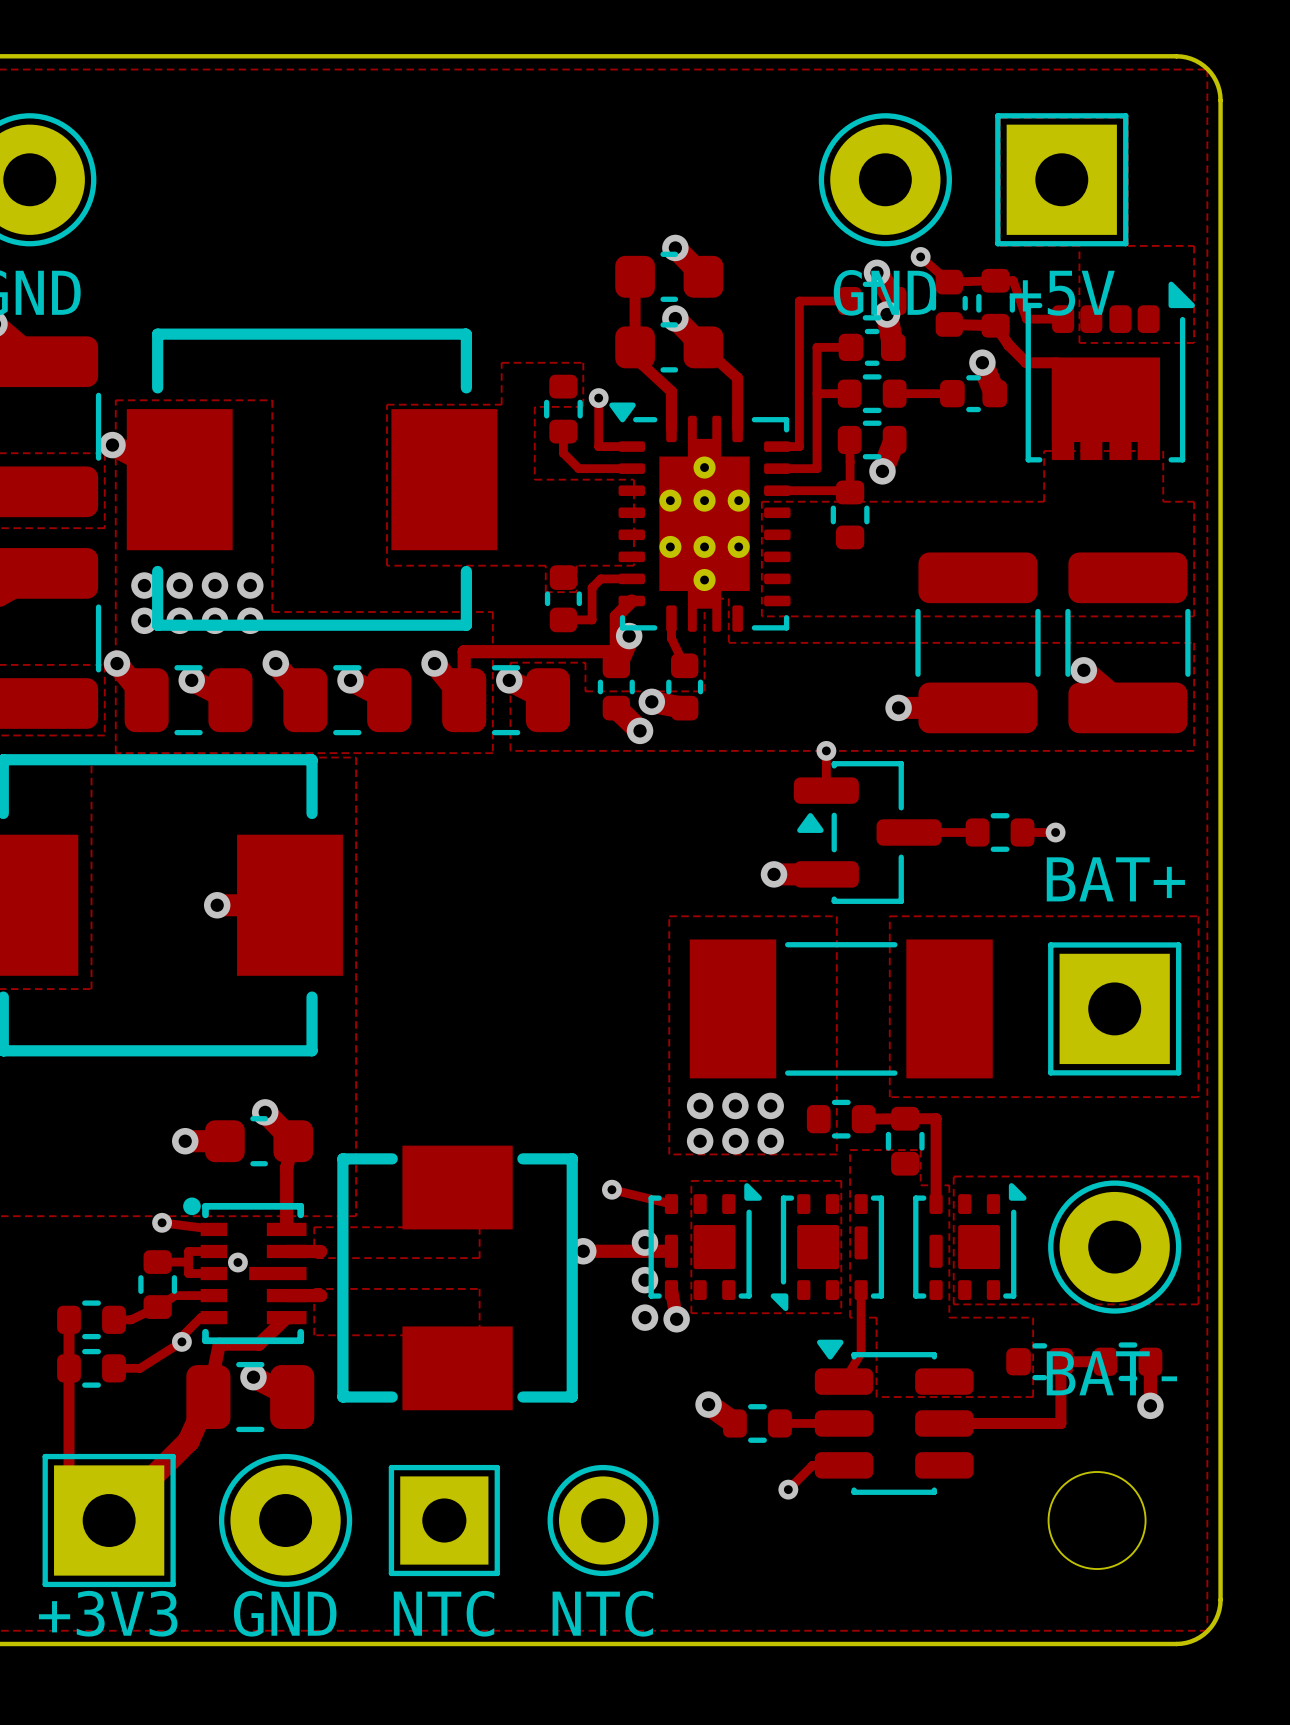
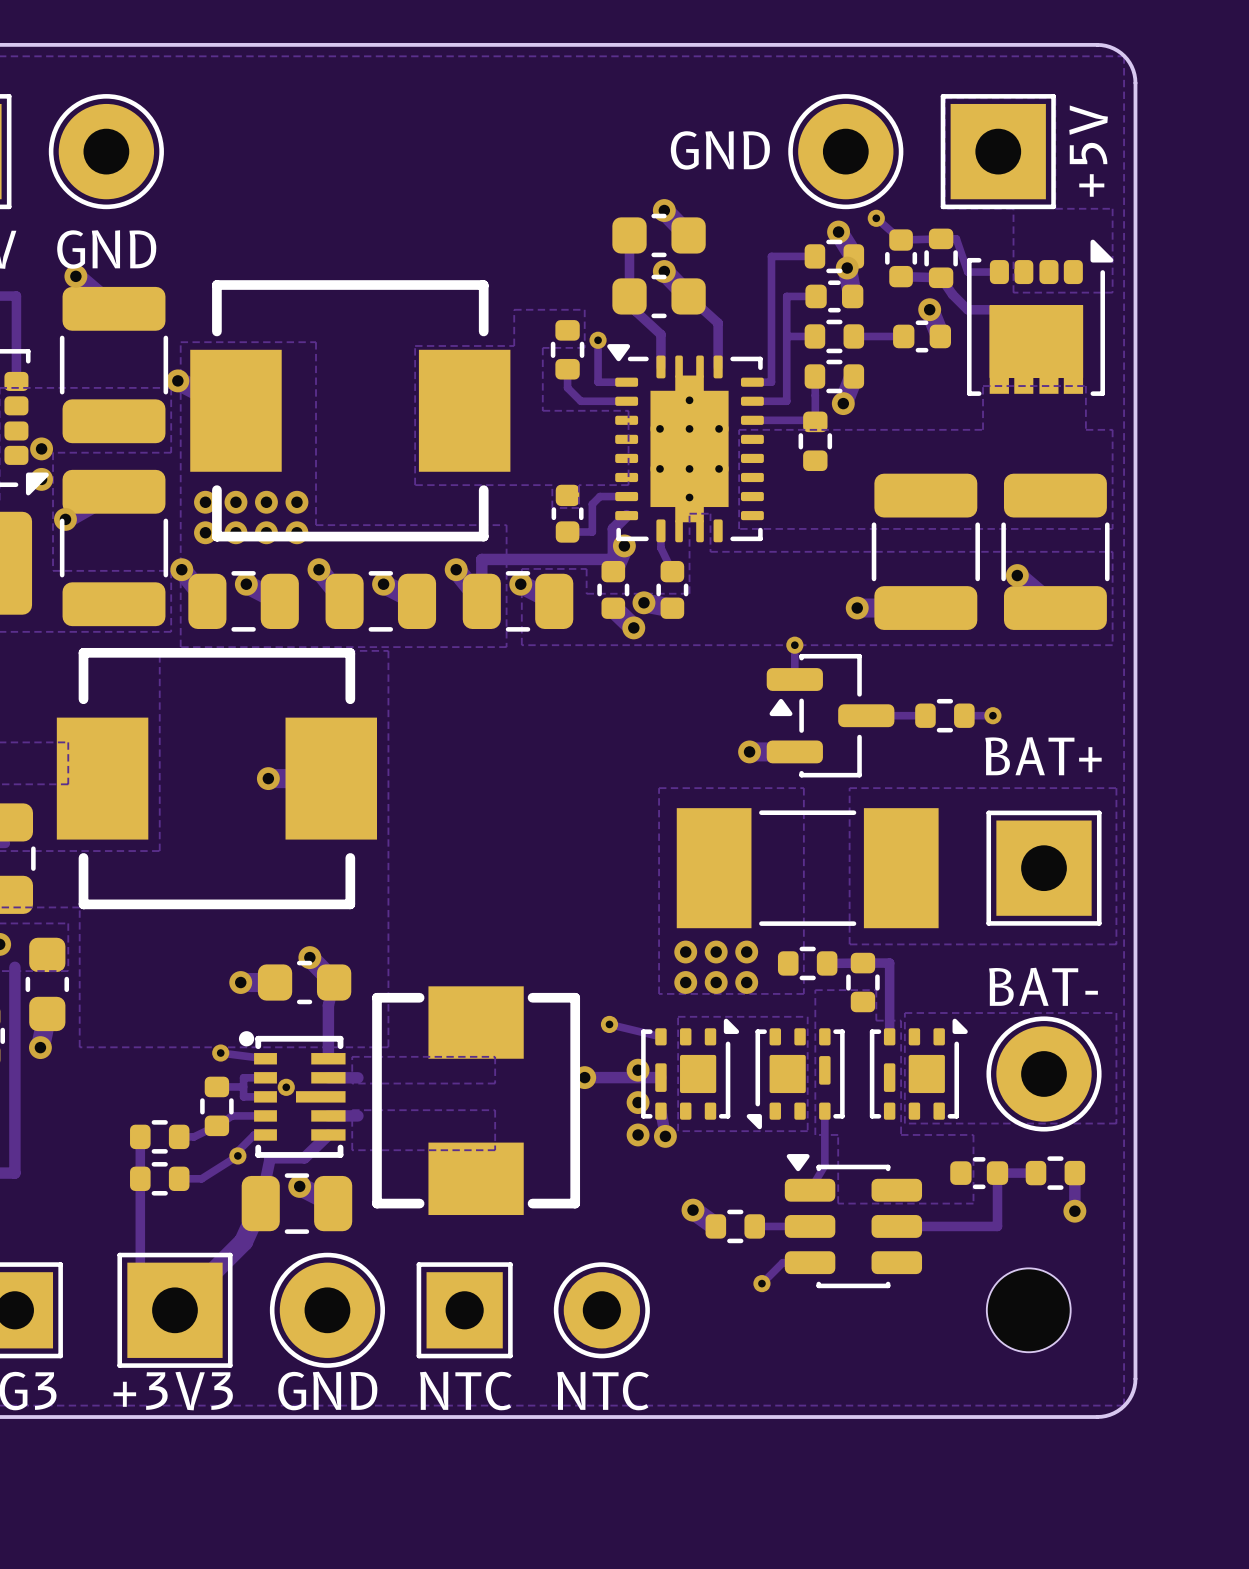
text position: GND (885, 292) -> GND (720, 150)
text rotation: 0° (1062, 293) -> 90° counterclockwise (1088, 151)
text position: BAT- (1111, 1373) -> BAT- (1043, 986)

